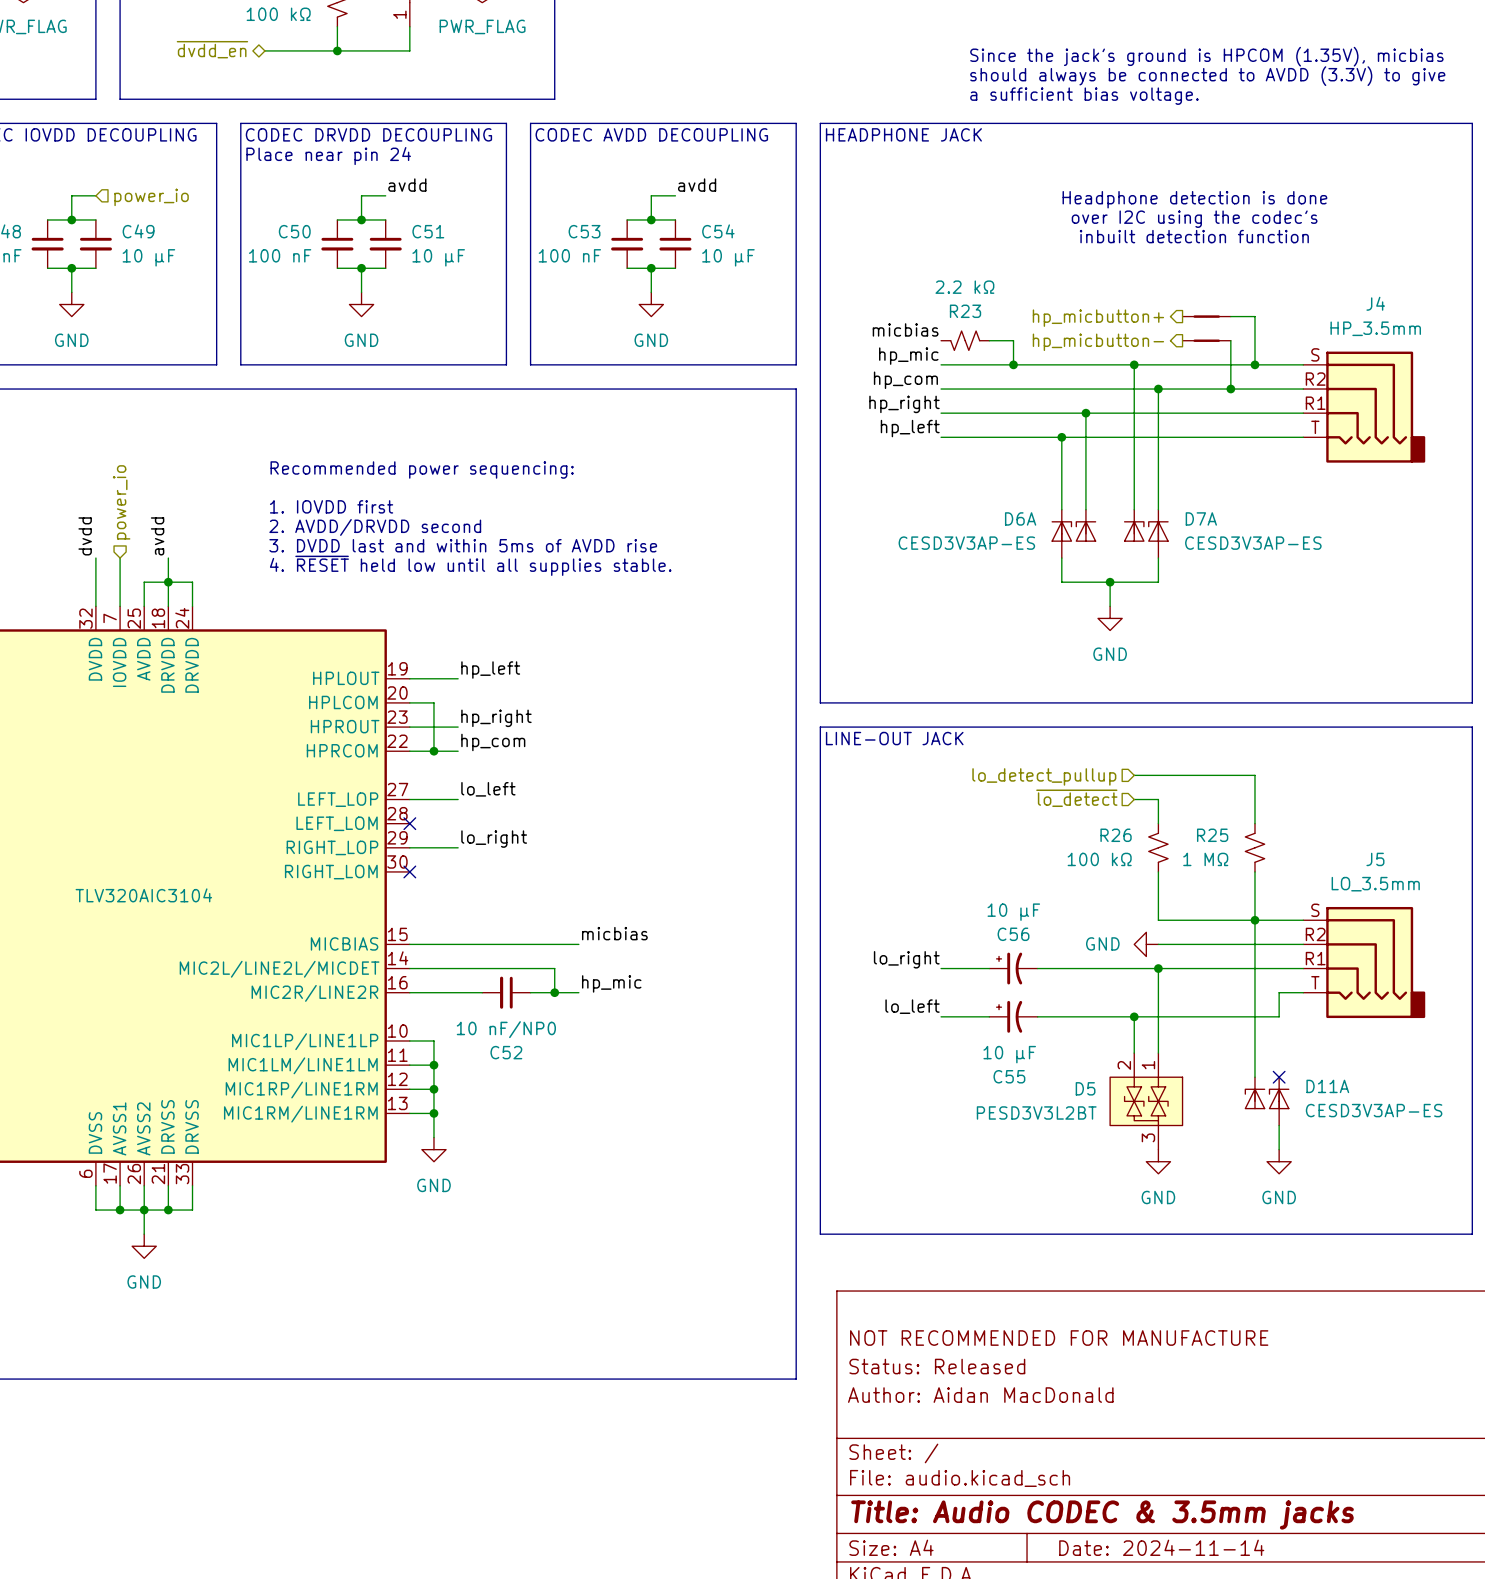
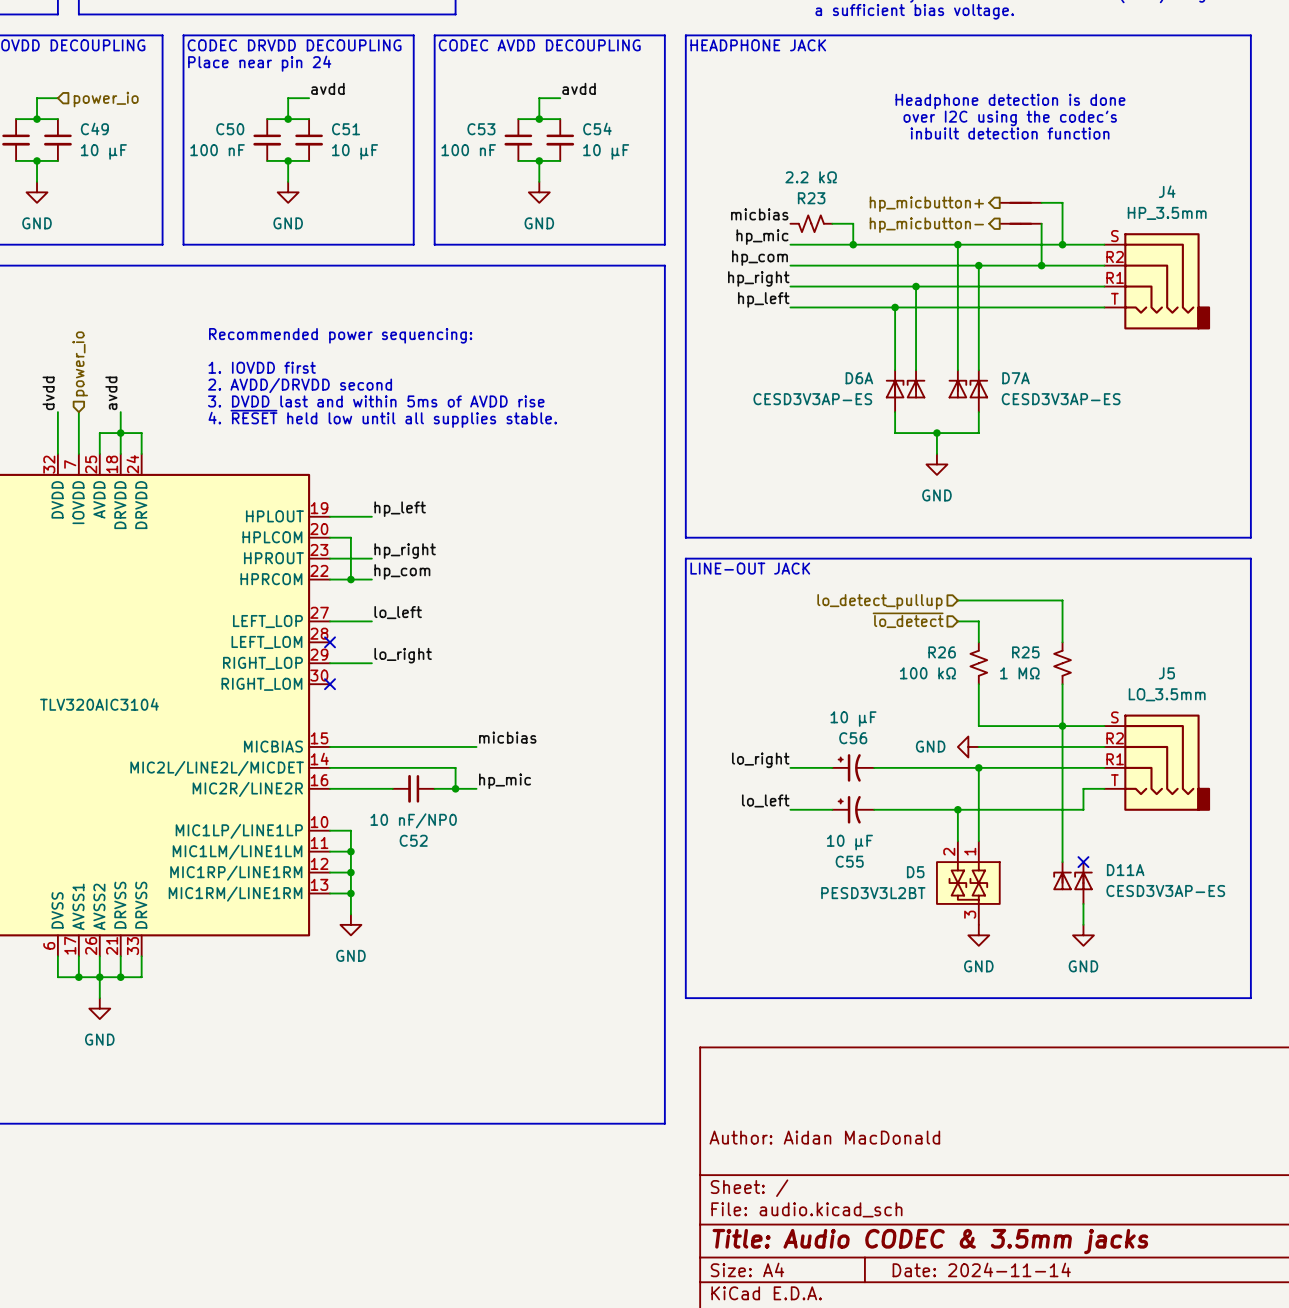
title block: NOT RECOMMENDED FOR MANUFACTURE (1059, 1338) -> none
title block: Status: Released (937, 1366) -> none

